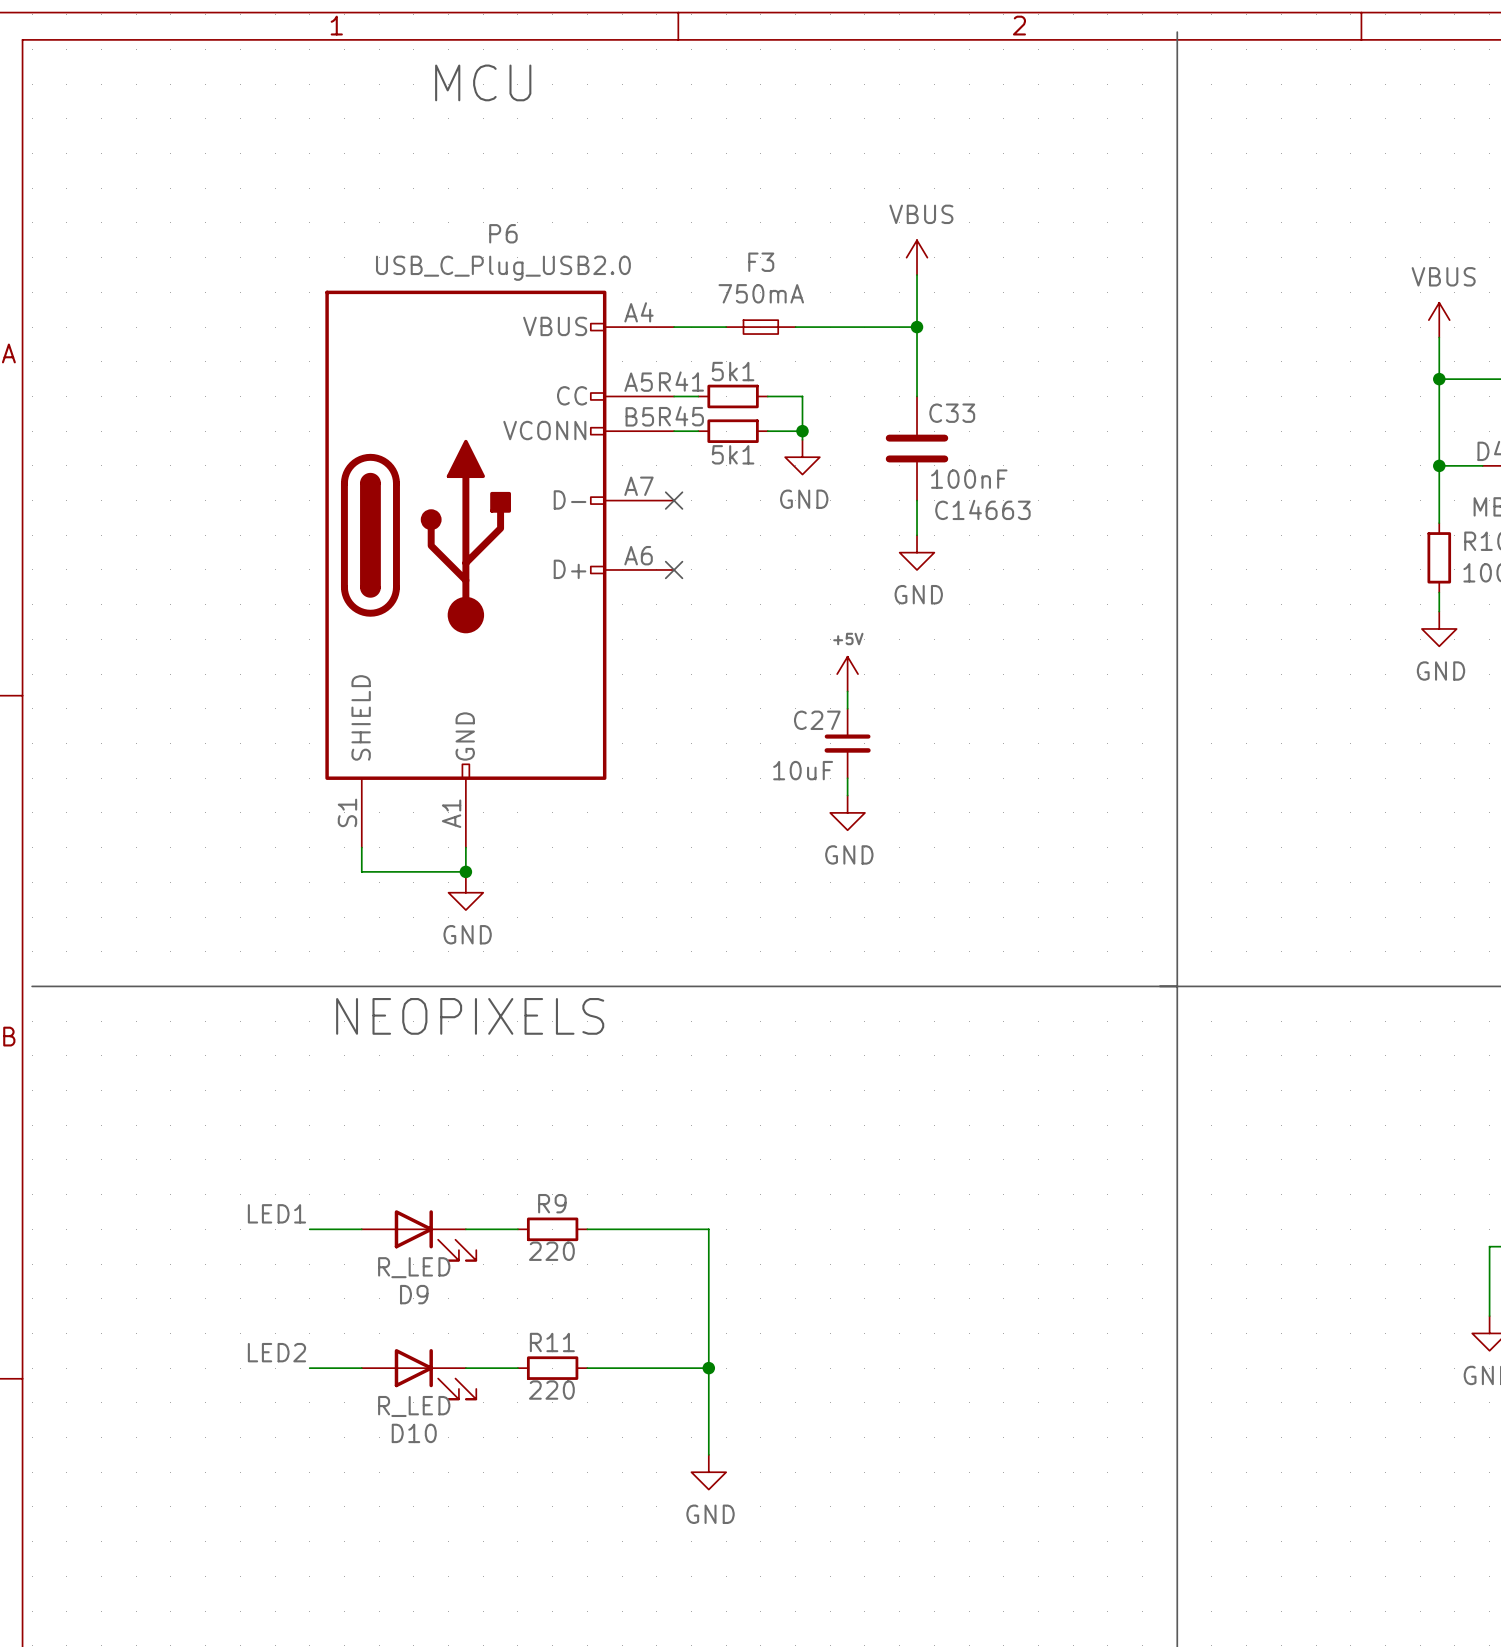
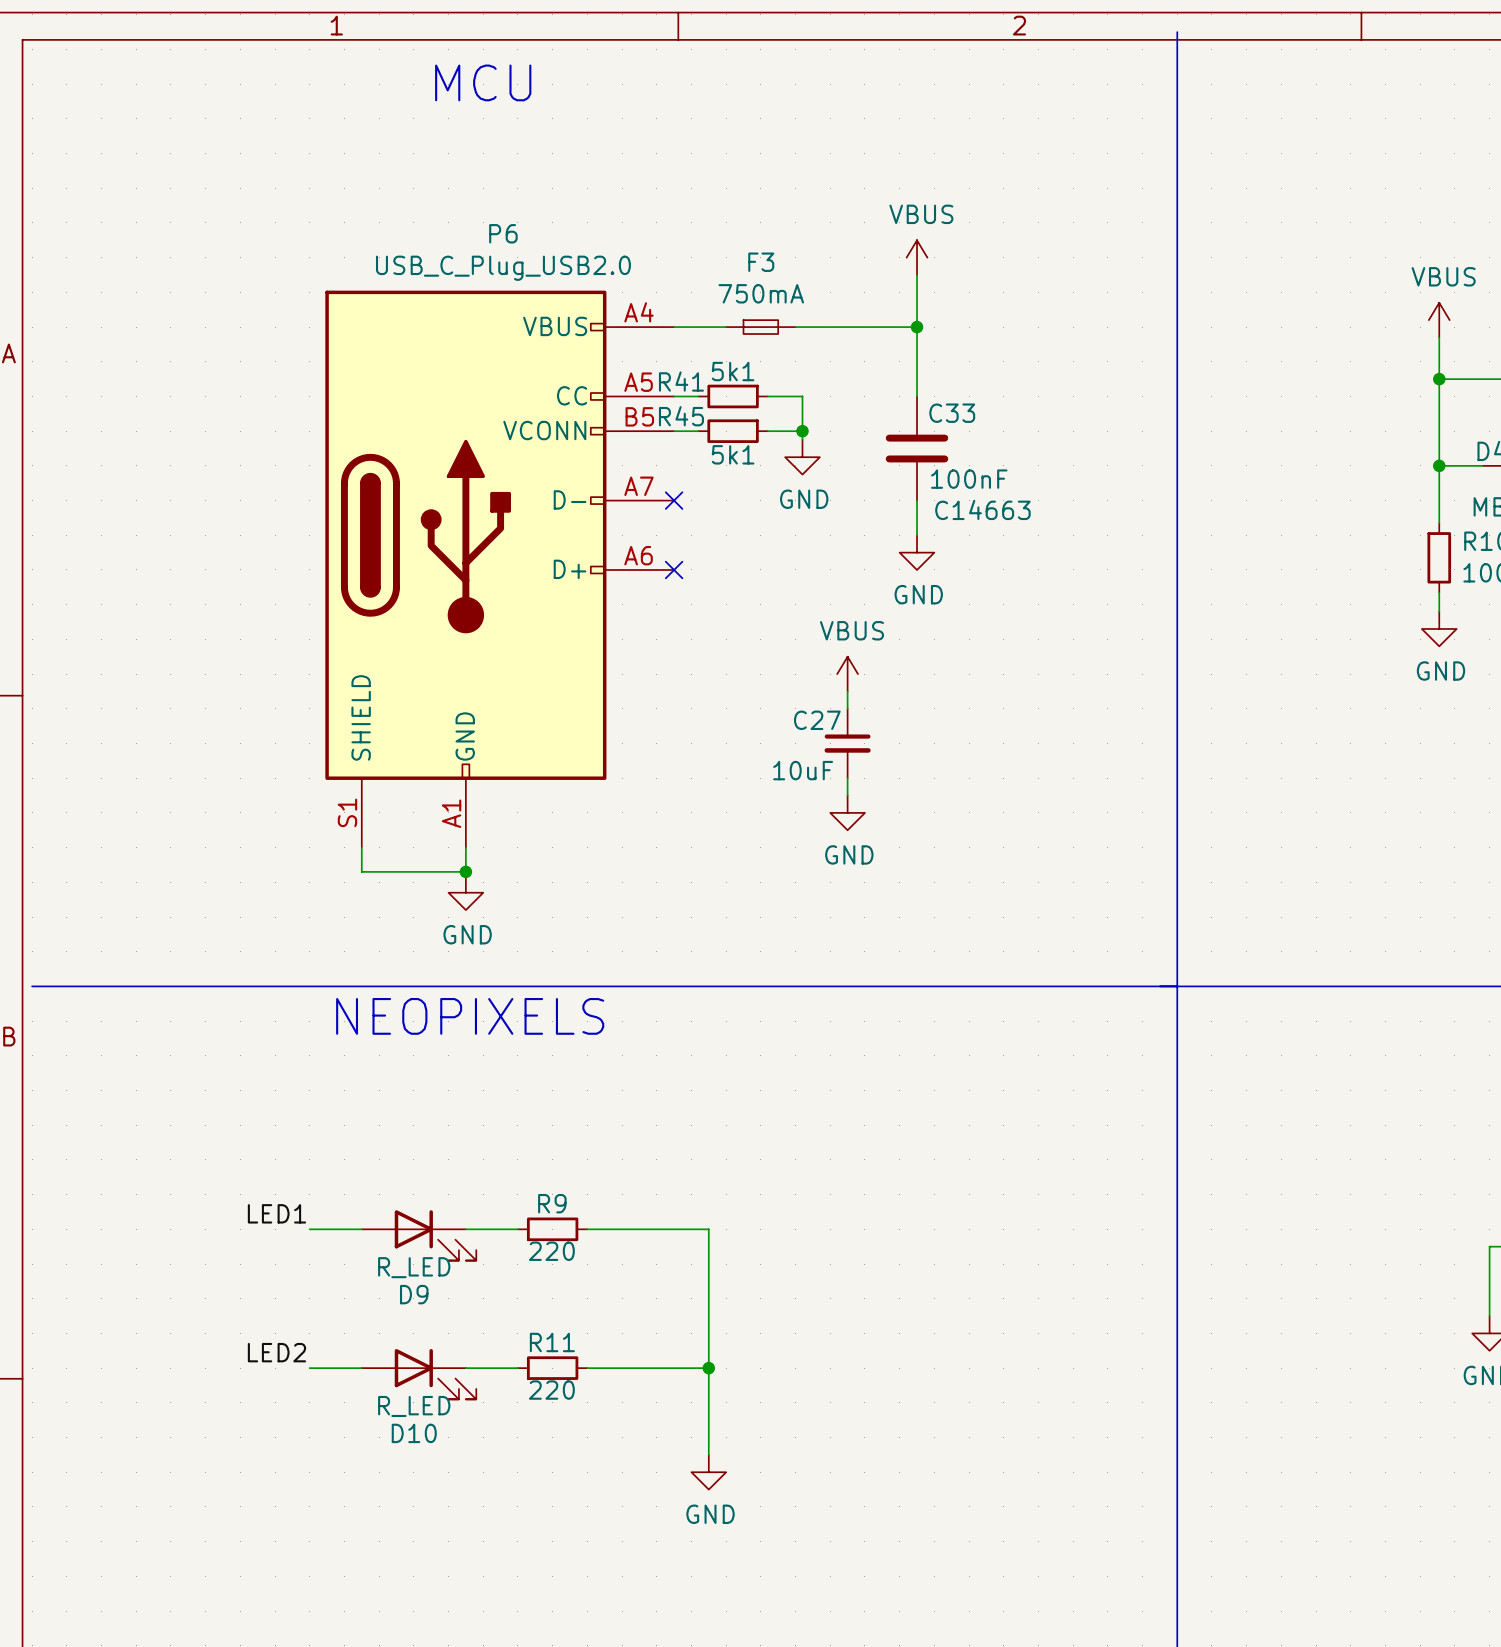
power symbol: +5V (847, 674) -> VBUS (847, 674)

